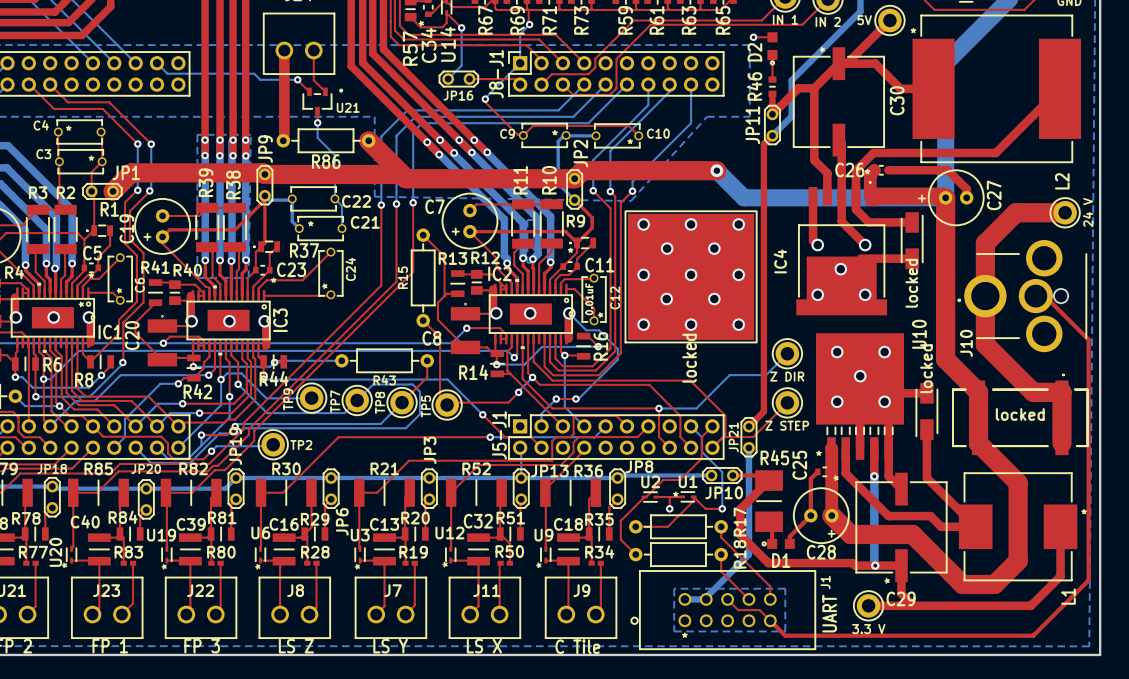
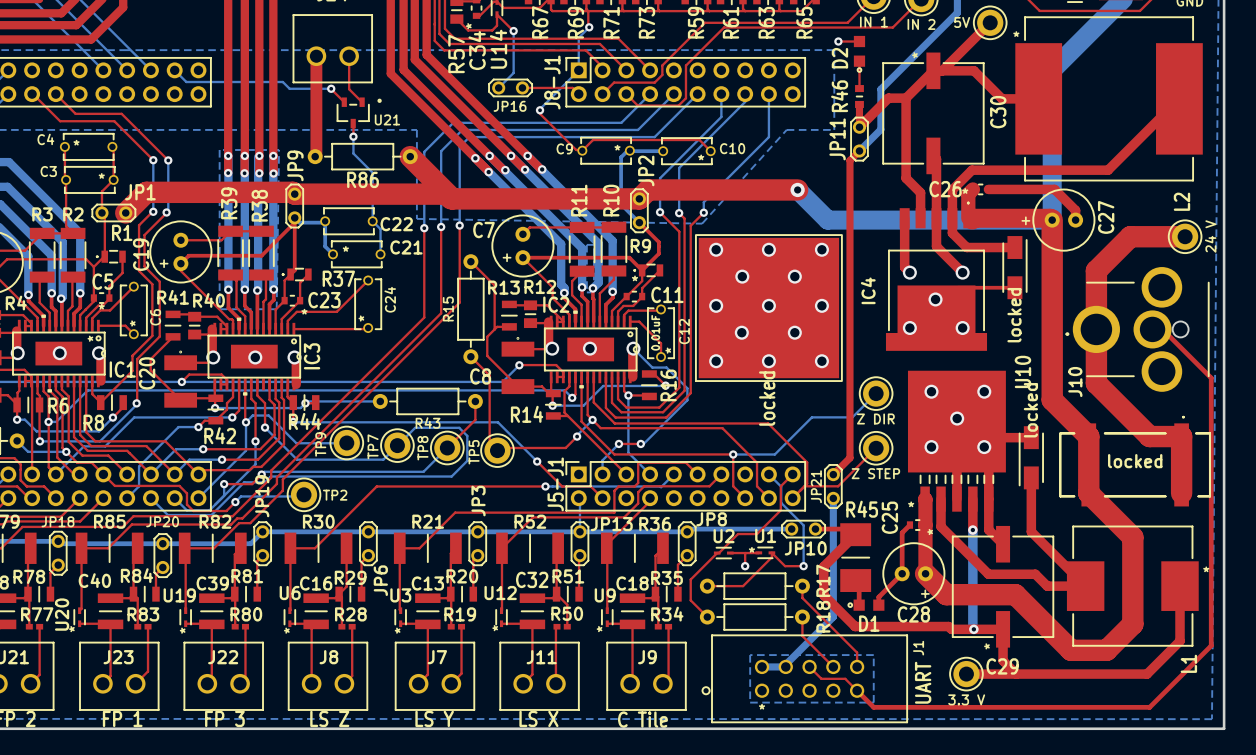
top track width: thick (860, 258) (912, 258) -> thin (957, 287) (1014, 287)

